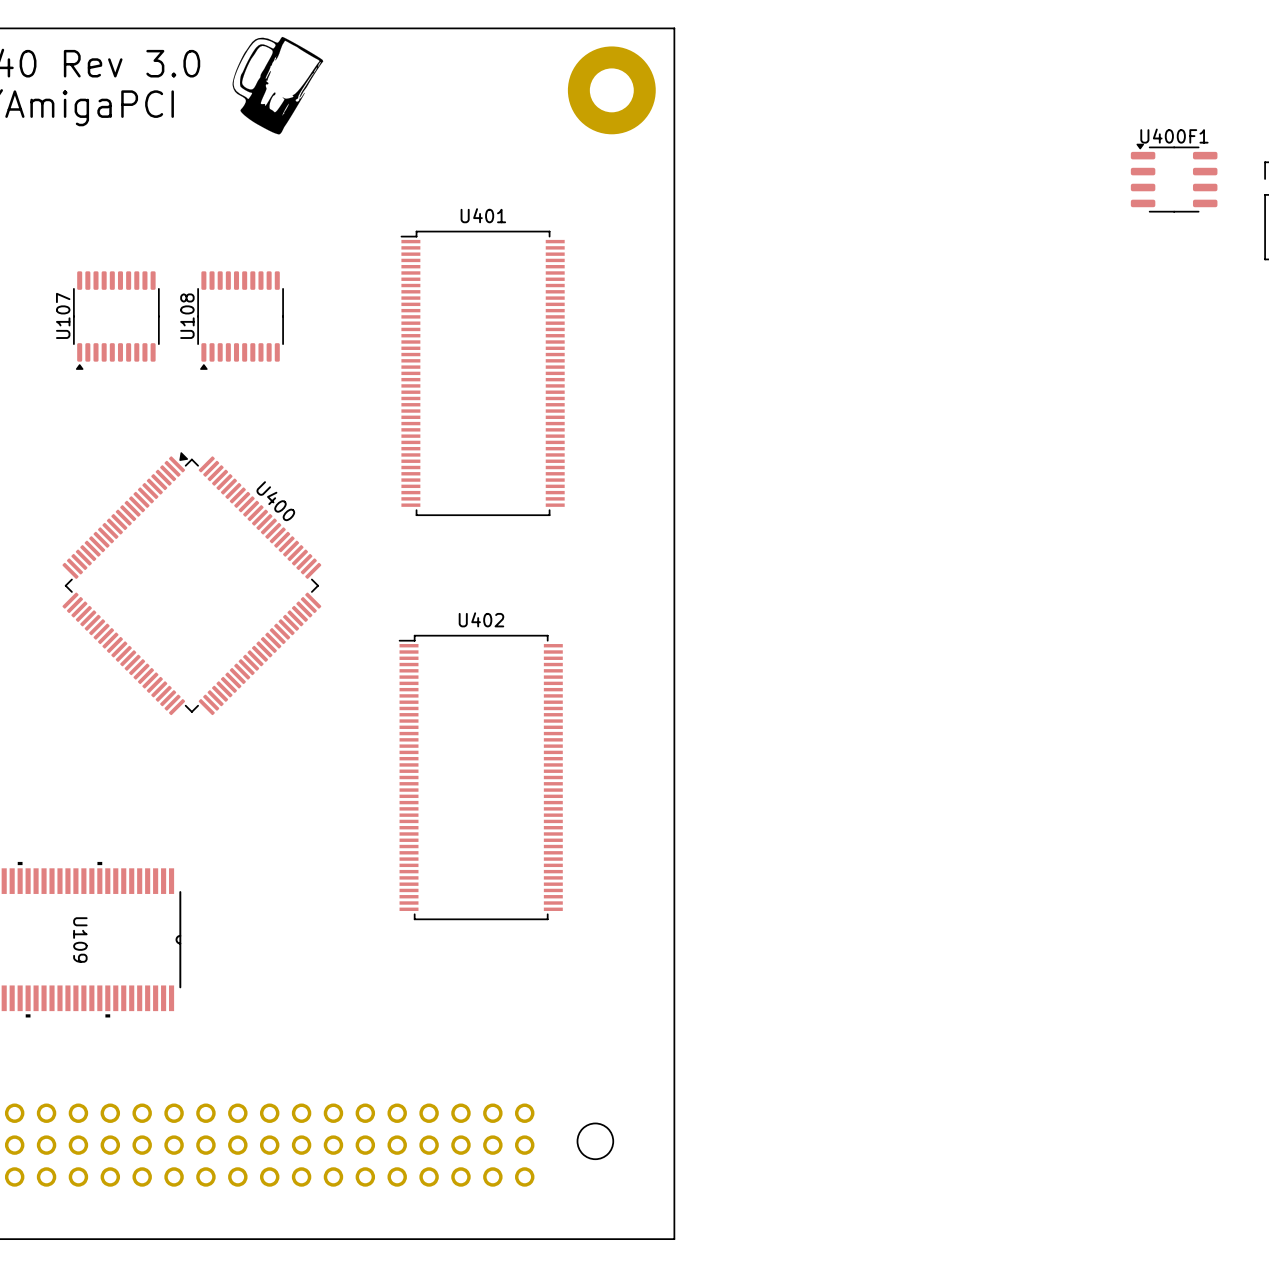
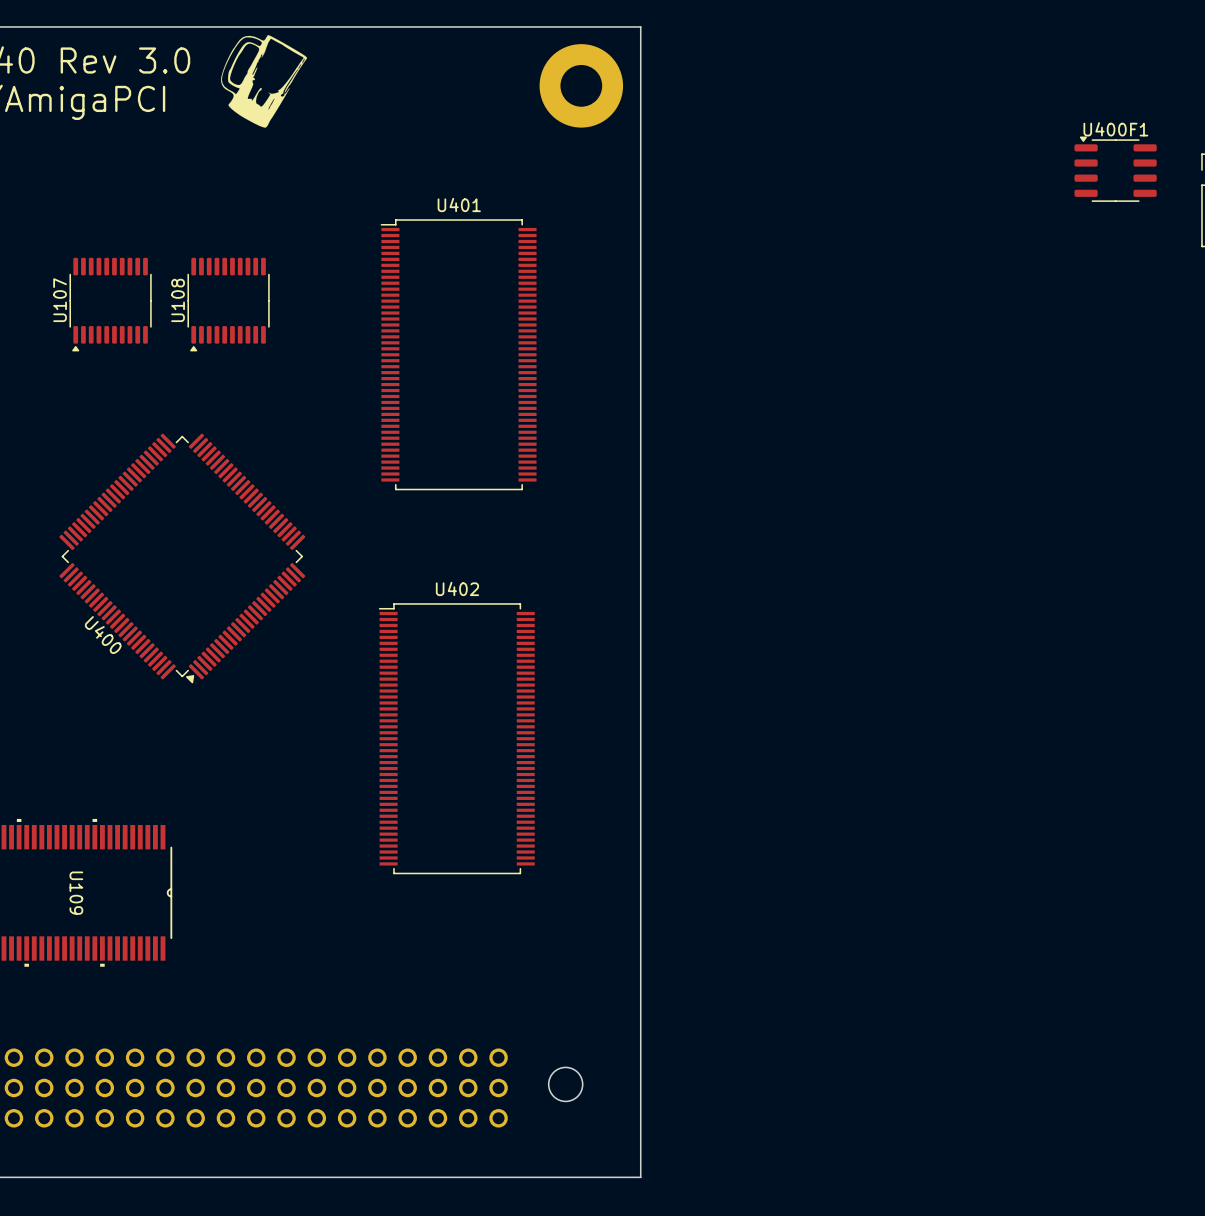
U400 rotation: 0° (191, 583) -> 180° (182, 558)

